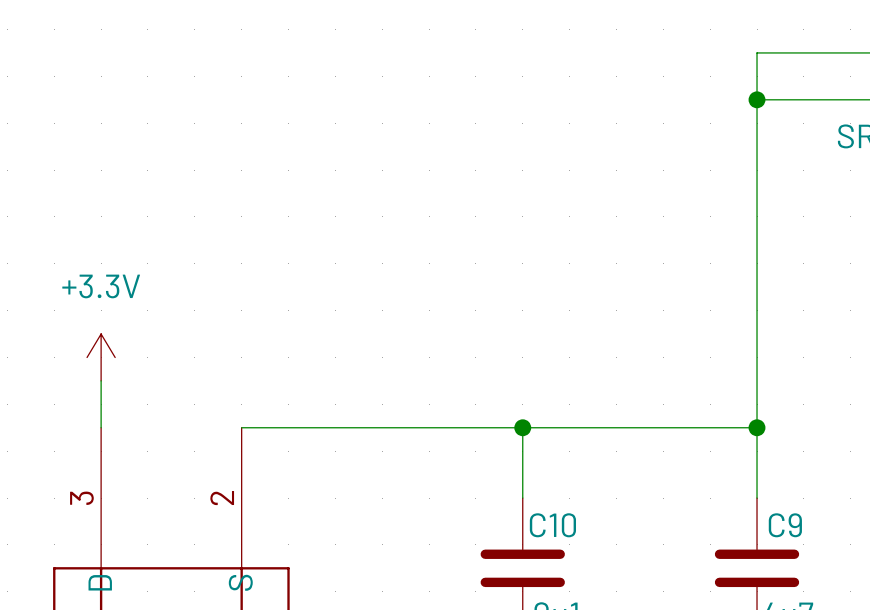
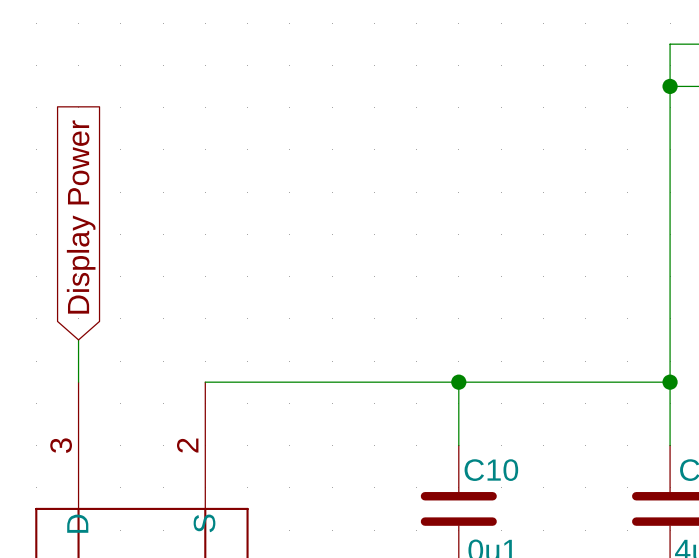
global label: none -> Display Power (81, 217)
power symbol: +3.3V (101, 357) -> none

